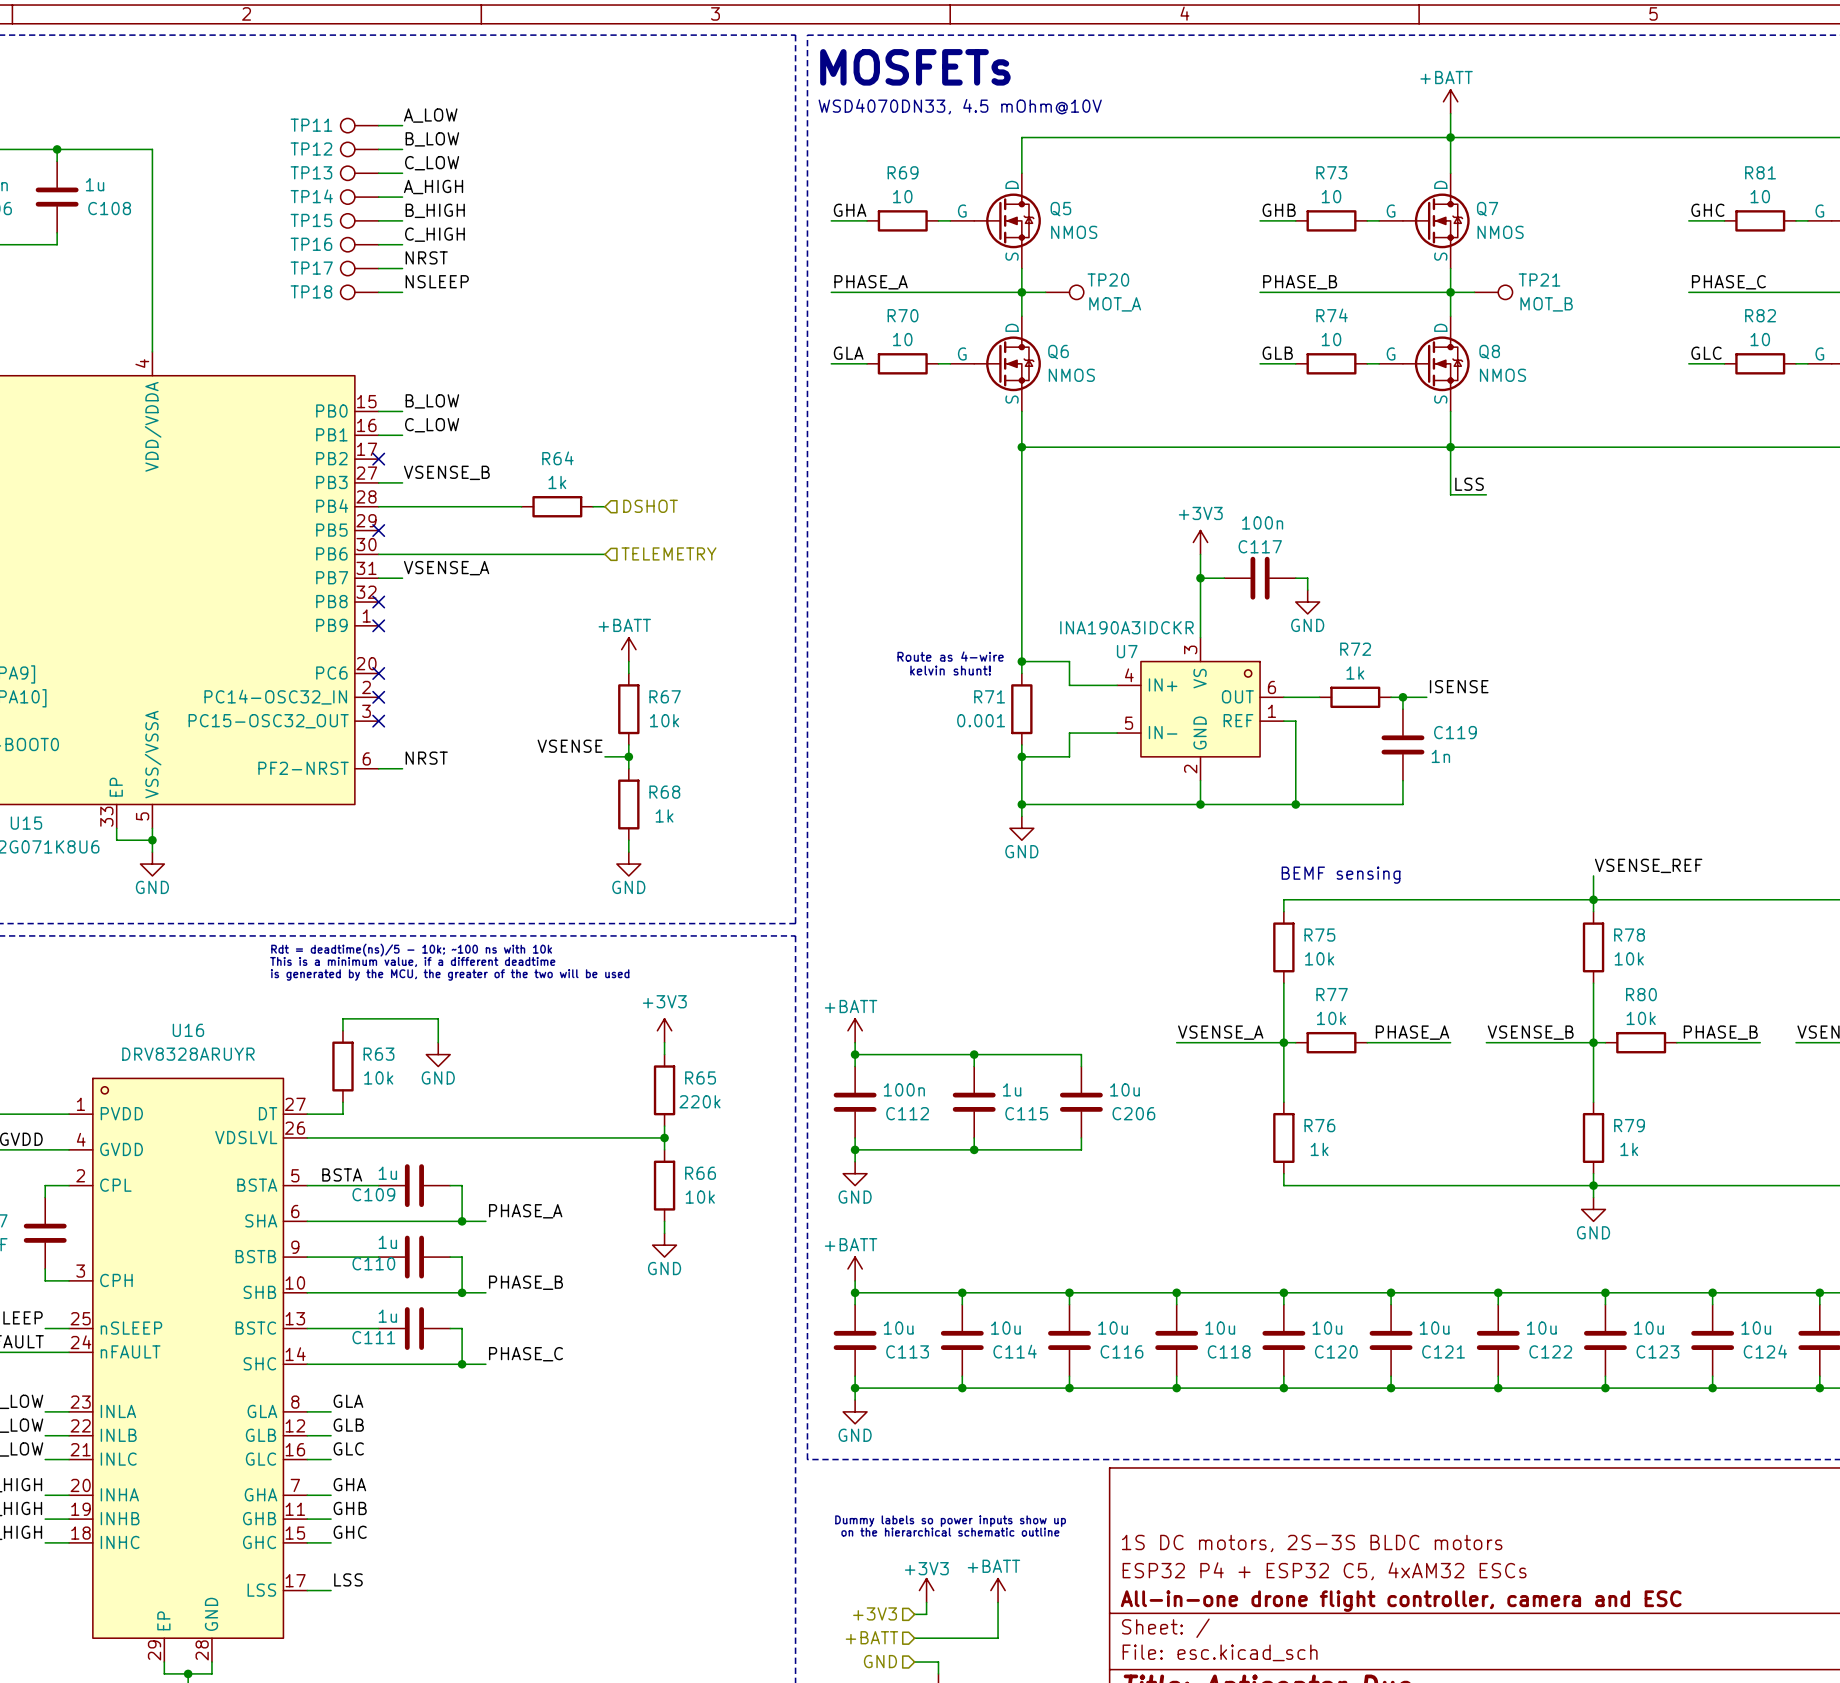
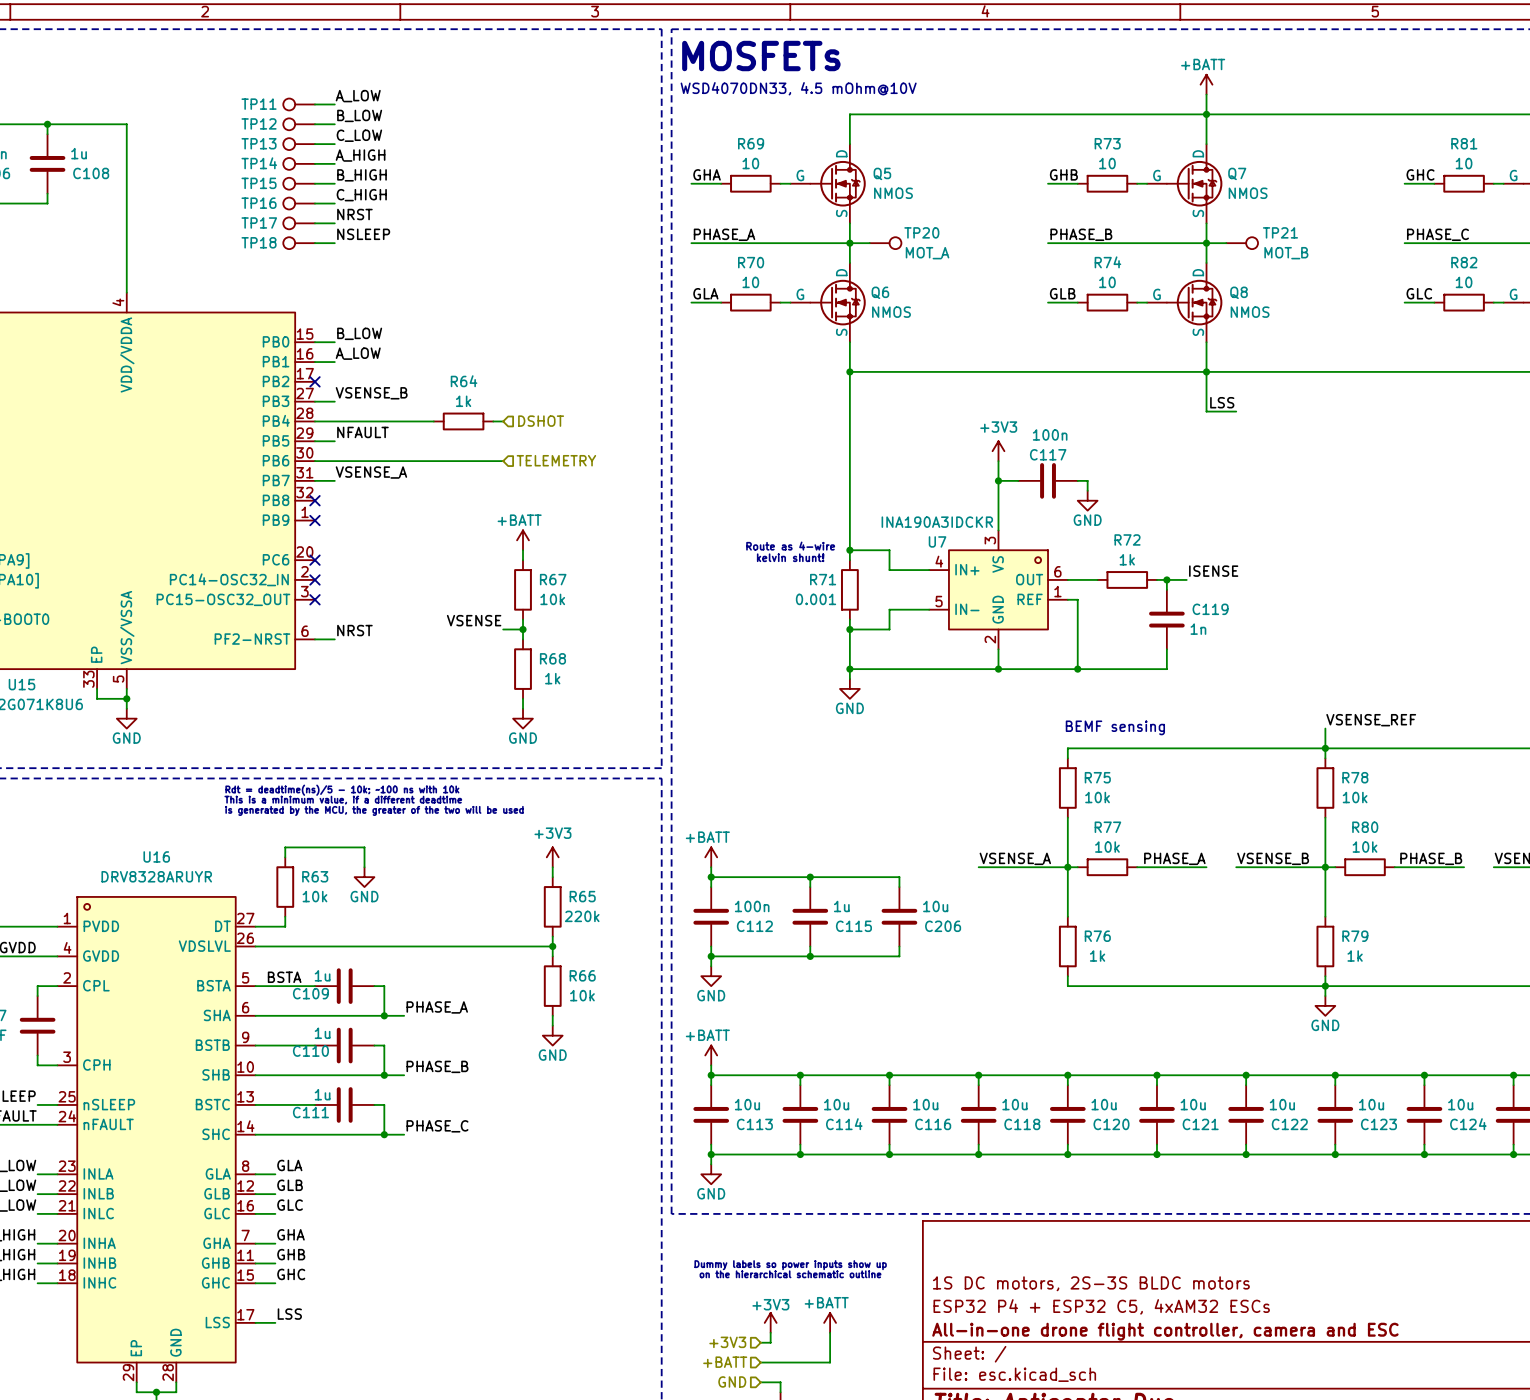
label: C_LOW (432, 425) -> A_LOW (358, 353)
label: none -> NFAULT (362, 432)
wire: none -> (314, 441) (334, 441)
no-connect mark: (378, 530) -> none

